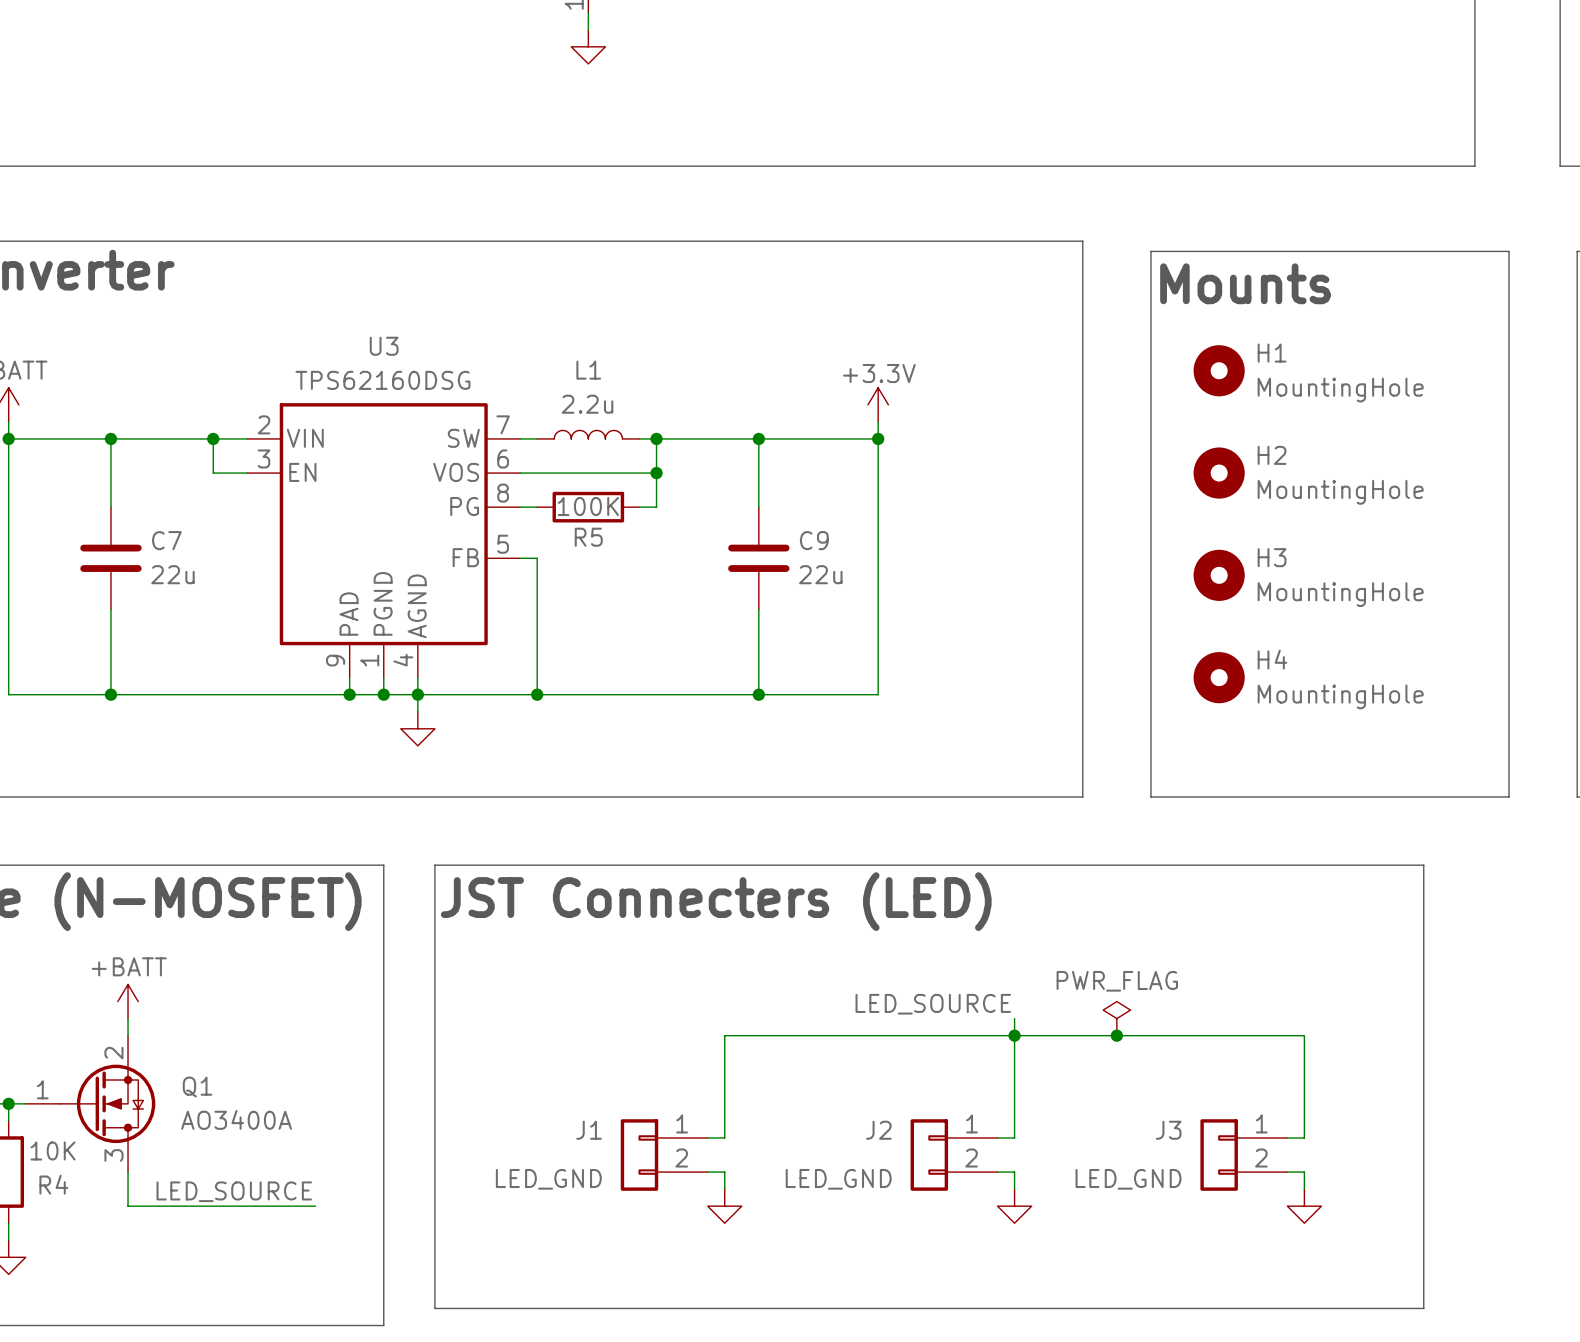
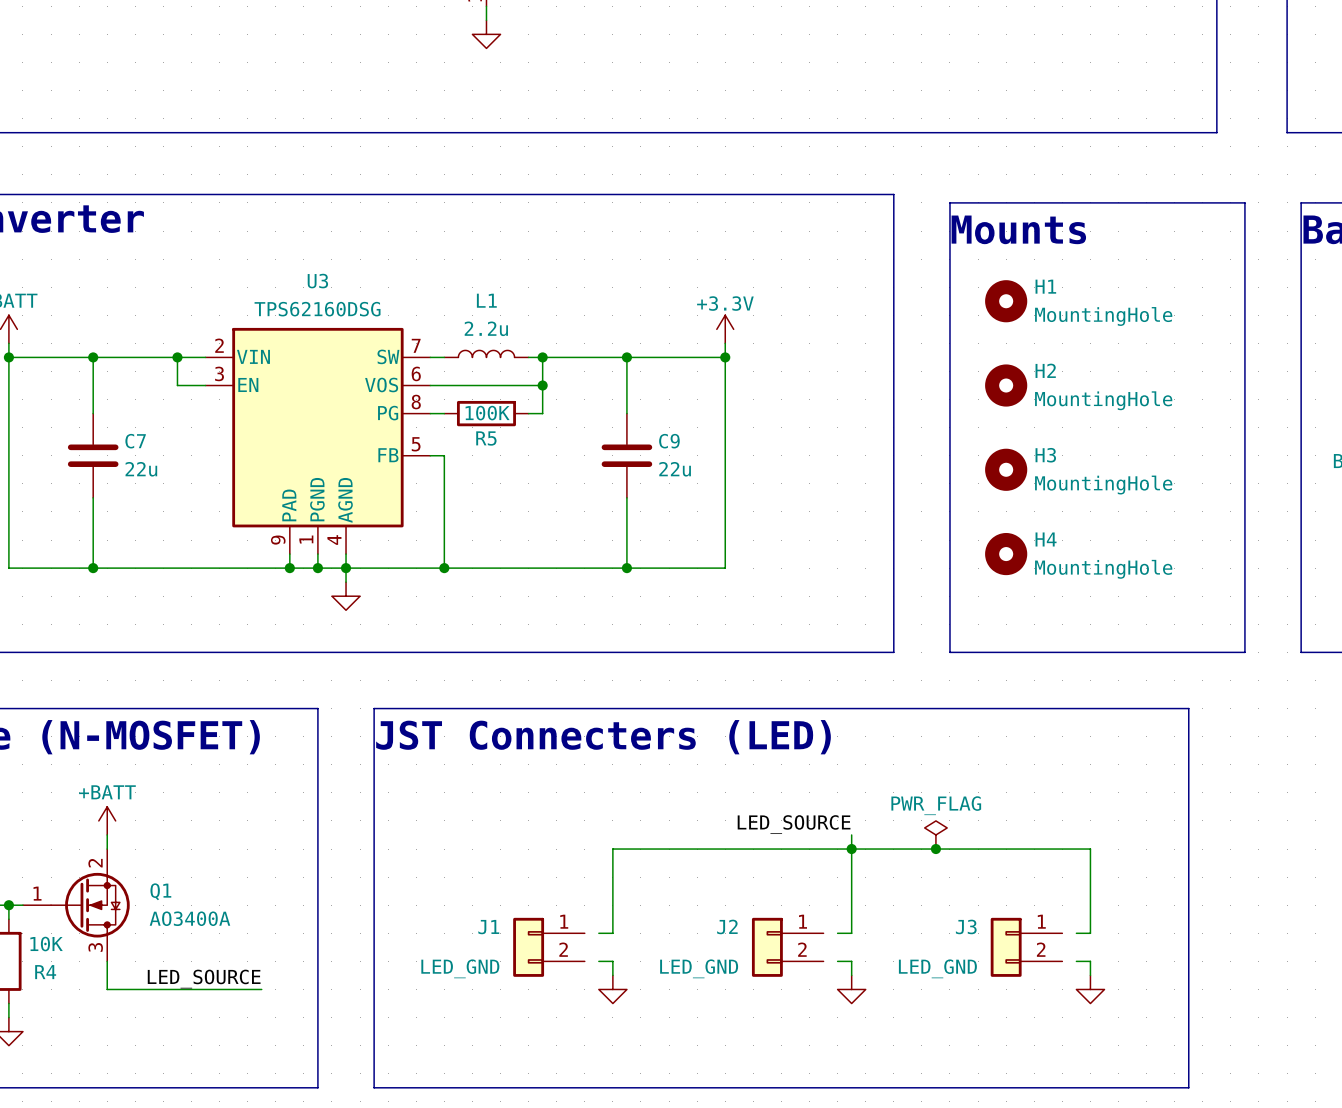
line: (451, 865) (434, 865) (434, 1308) (1423, 1308) (1423, 865) -> (374, 708) (374, 1087) (1188, 1087) (1188, 708) (1174, 708)
text position: JST Connecters (LED) (716, 901) -> JST Connecters (LED) (603, 737)
label position: LED_SOURCE (933, 1004) -> LED_SOURCE (794, 824)
wire: (1014, 1018) (1014, 1137) (997, 1137) -> (851, 834) (851, 933) (837, 933)
power symbol position: PWR_FLAG (1116, 1018) -> PWR_FLAG (935, 834)
wire: (741, 1035) (724, 1035) (724, 1137) (707, 1137) -> (612, 849) (612, 933) (598, 933)
junction position: (1014, 1035) -> (851, 849)
junction position: (1116, 1035) -> (935, 849)
wire: (1304, 1035) (1304, 1137) (1287, 1137) -> (1076, 849) (1090, 849) (1090, 933) (1076, 933)
wire: (707, 1172) (724, 1172) (724, 1189) -> (598, 961) (612, 961) (612, 975)
wire: (997, 1172) (1014, 1172) (1014, 1189) -> (837, 961) (851, 961) (851, 975)
wire: (1287, 1172) (1304, 1172) (1304, 1189) -> (1076, 961) (1090, 961) (1090, 975)
power symbol position: (724, 1206) -> (612, 989)
power symbol position: (1014, 1206) -> (851, 989)
power symbol position: (1304, 1206) -> (1090, 989)

